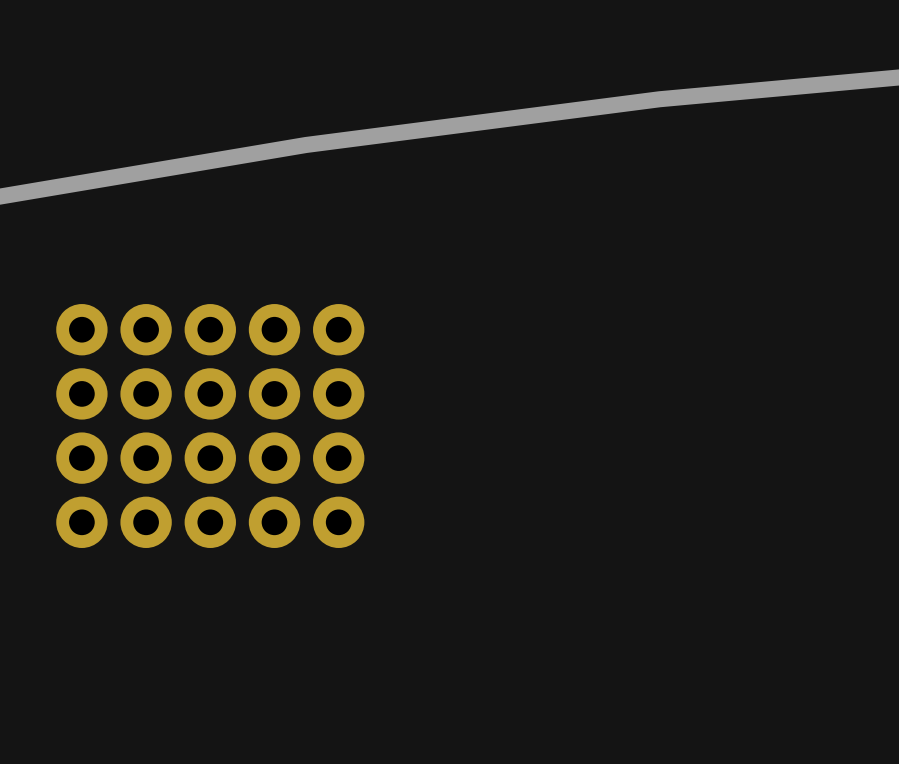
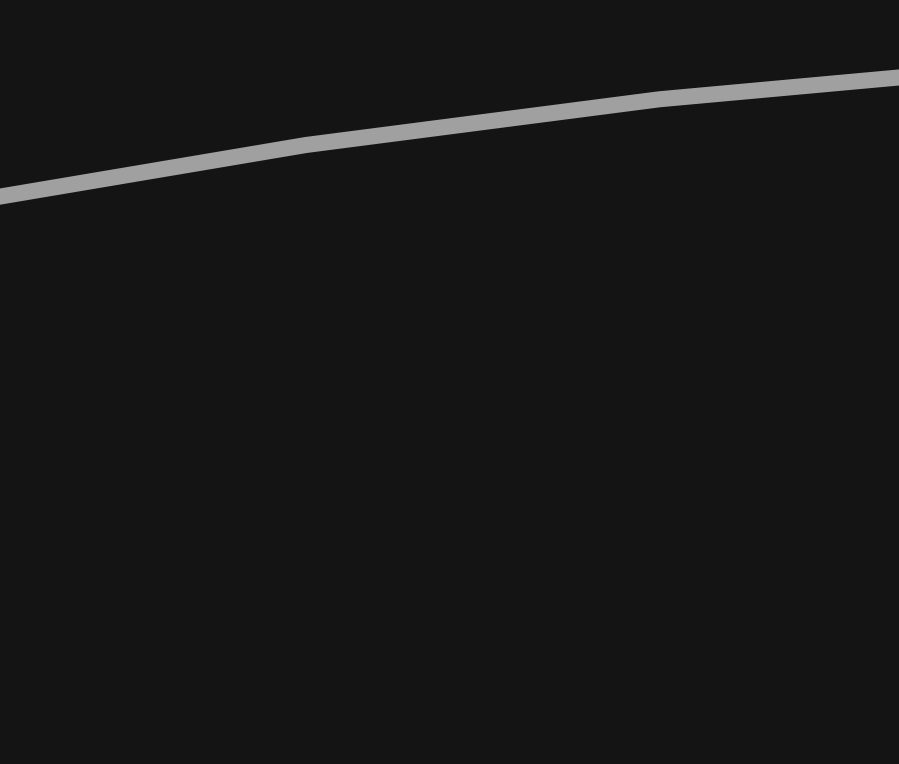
via: (81, 329) -> none
via: (146, 329) -> none
via: (210, 329) -> none
via: (274, 329) -> none
via: (338, 329) -> none
via: (81, 393) -> none
via: (146, 393) -> none
via: (210, 393) -> none
via: (274, 393) -> none
via: (338, 393) -> none
via: (81, 458) -> none
via: (146, 458) -> none
via: (210, 458) -> none
via: (274, 458) -> none
via: (338, 458) -> none
via: (81, 522) -> none
via: (146, 522) -> none
via: (210, 522) -> none
via: (274, 522) -> none
via: (338, 522) -> none

